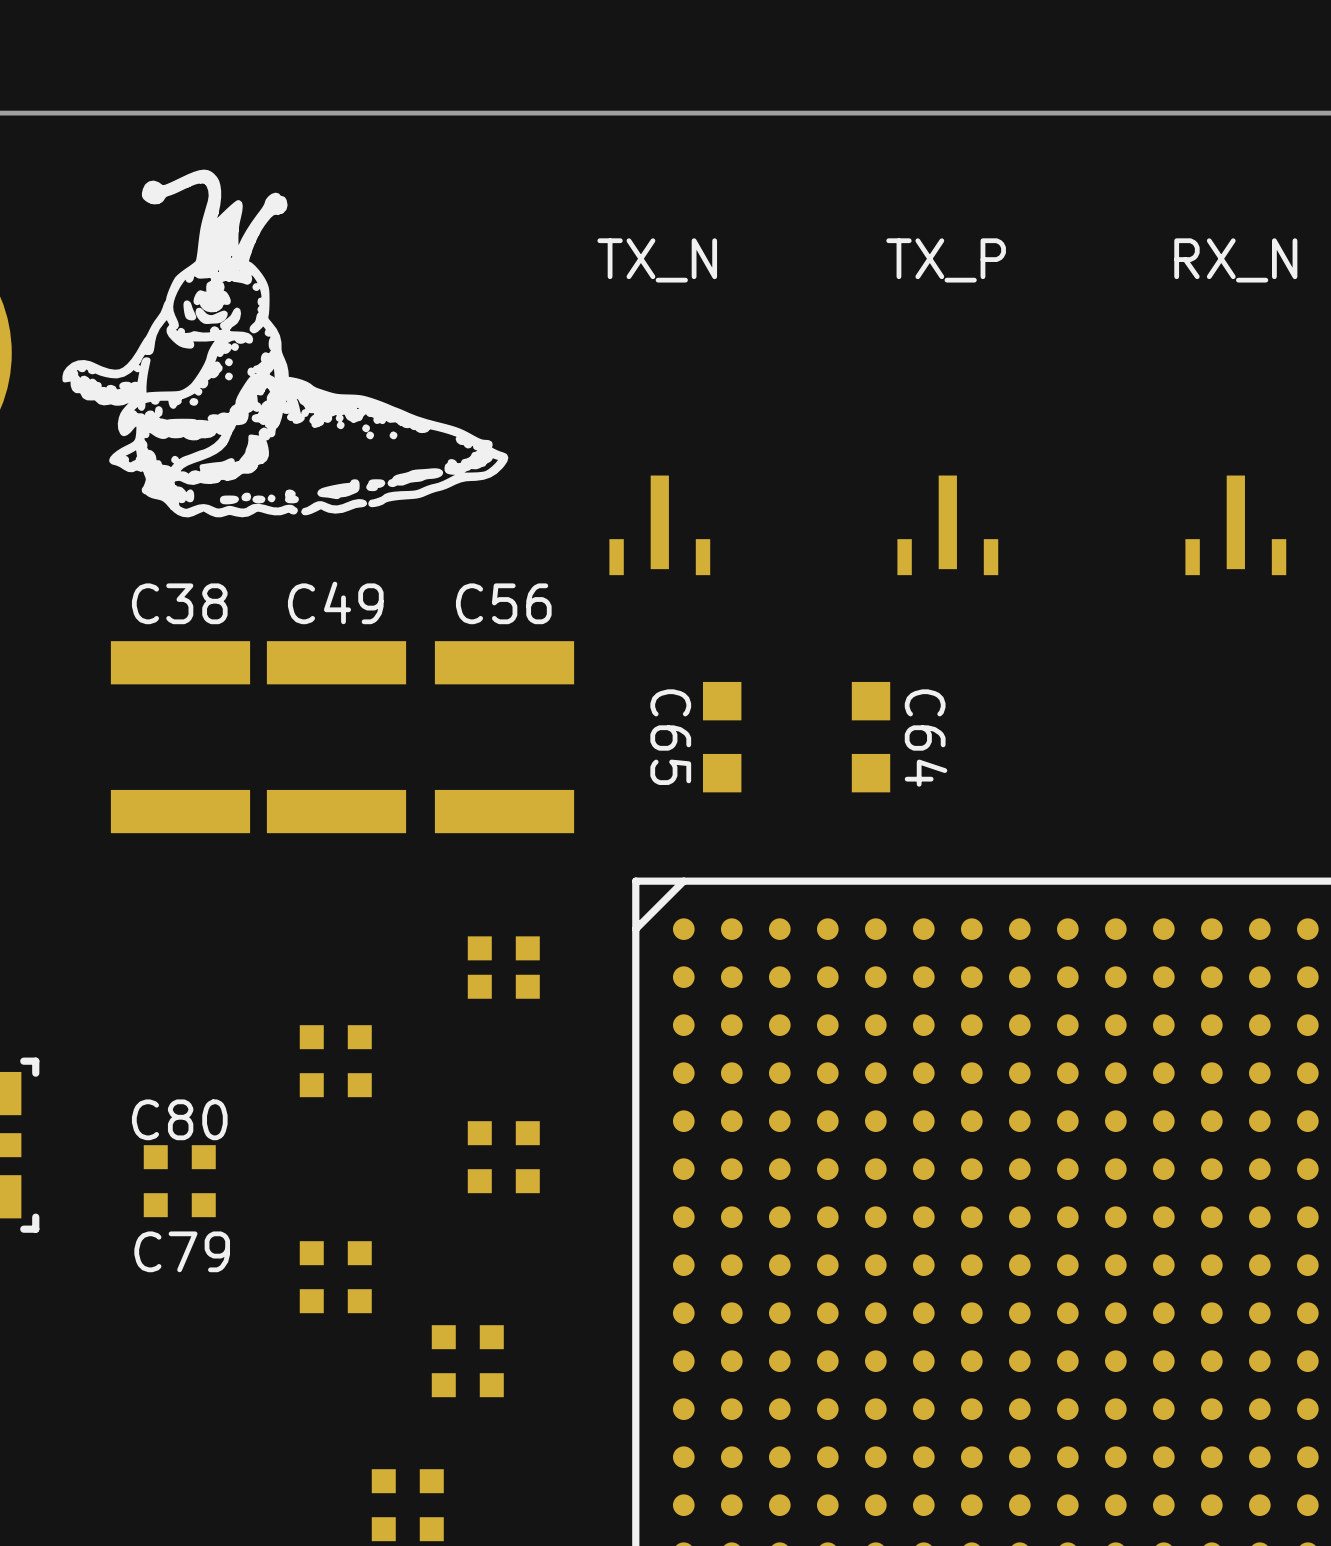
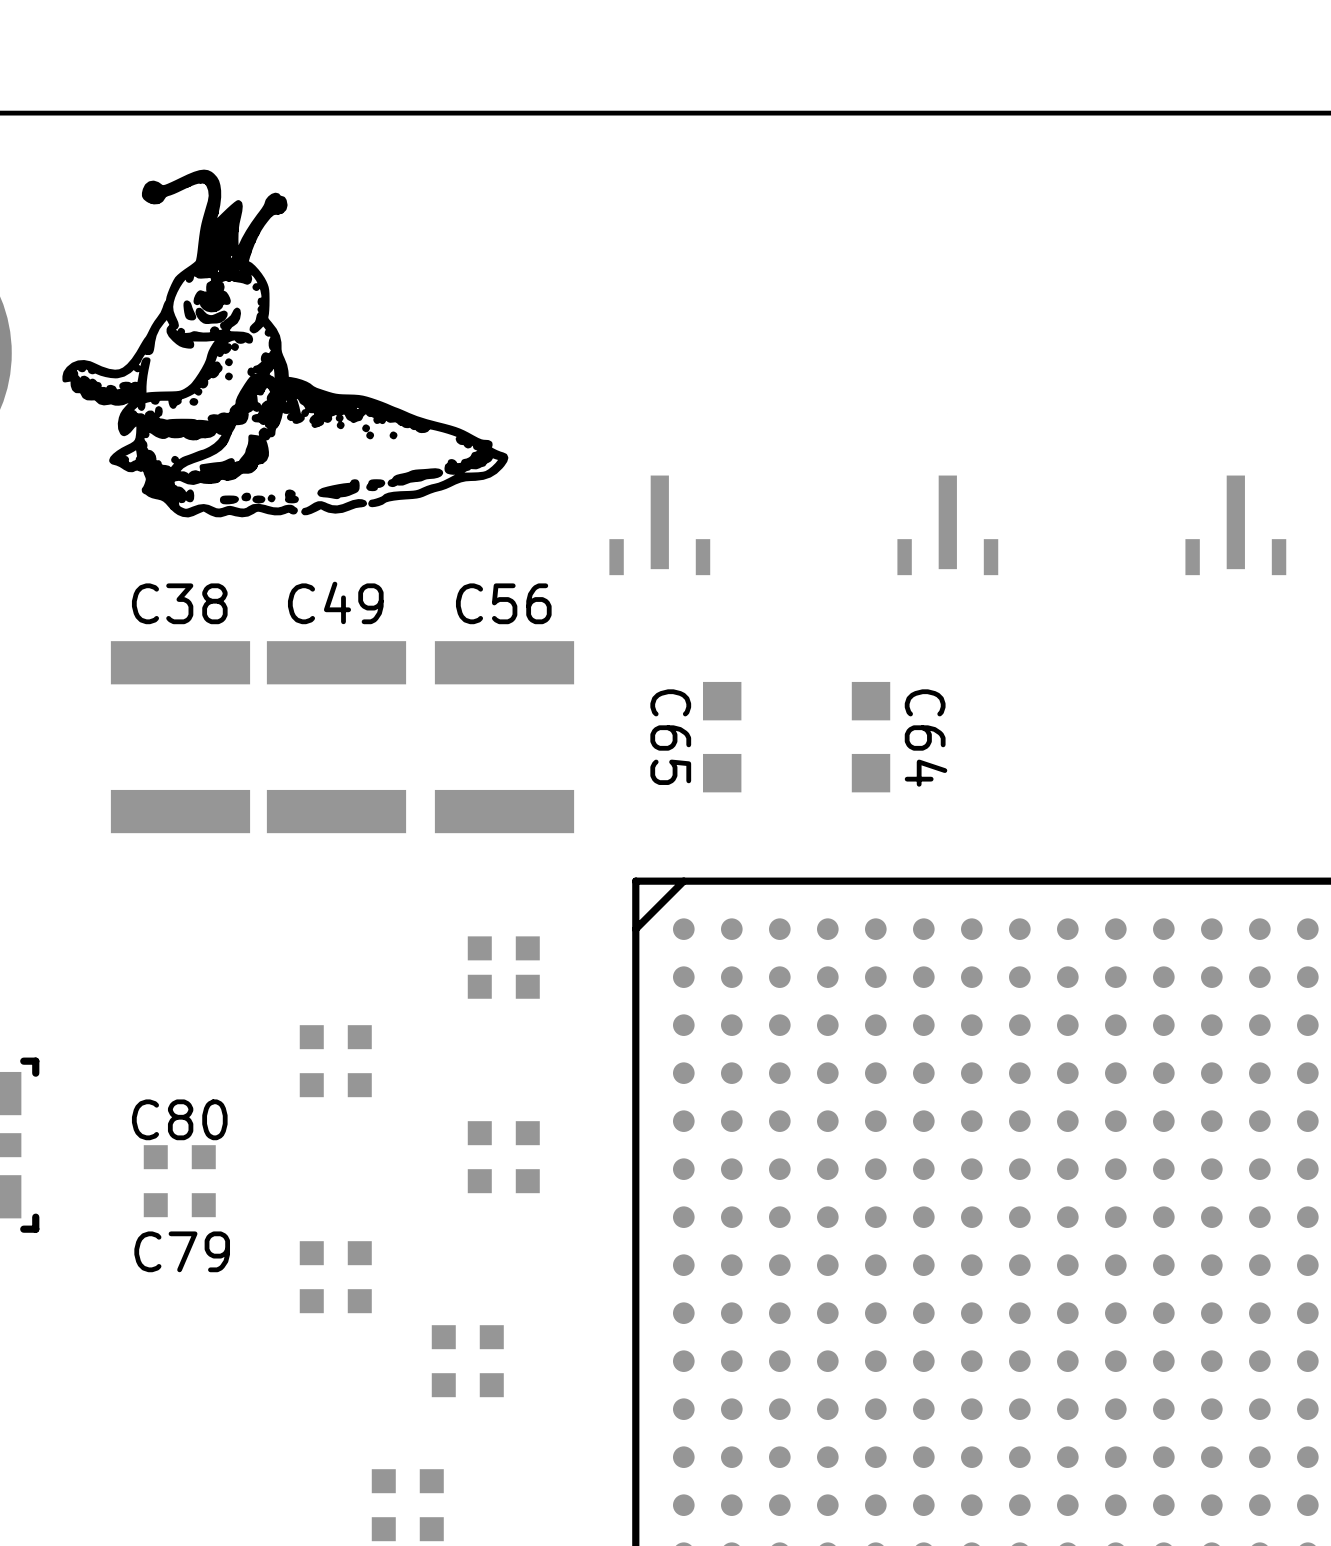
text: TX_N (657, 260) -> none
text: TX_P (946, 260) -> none
text: RX_N (1235, 260) -> none

